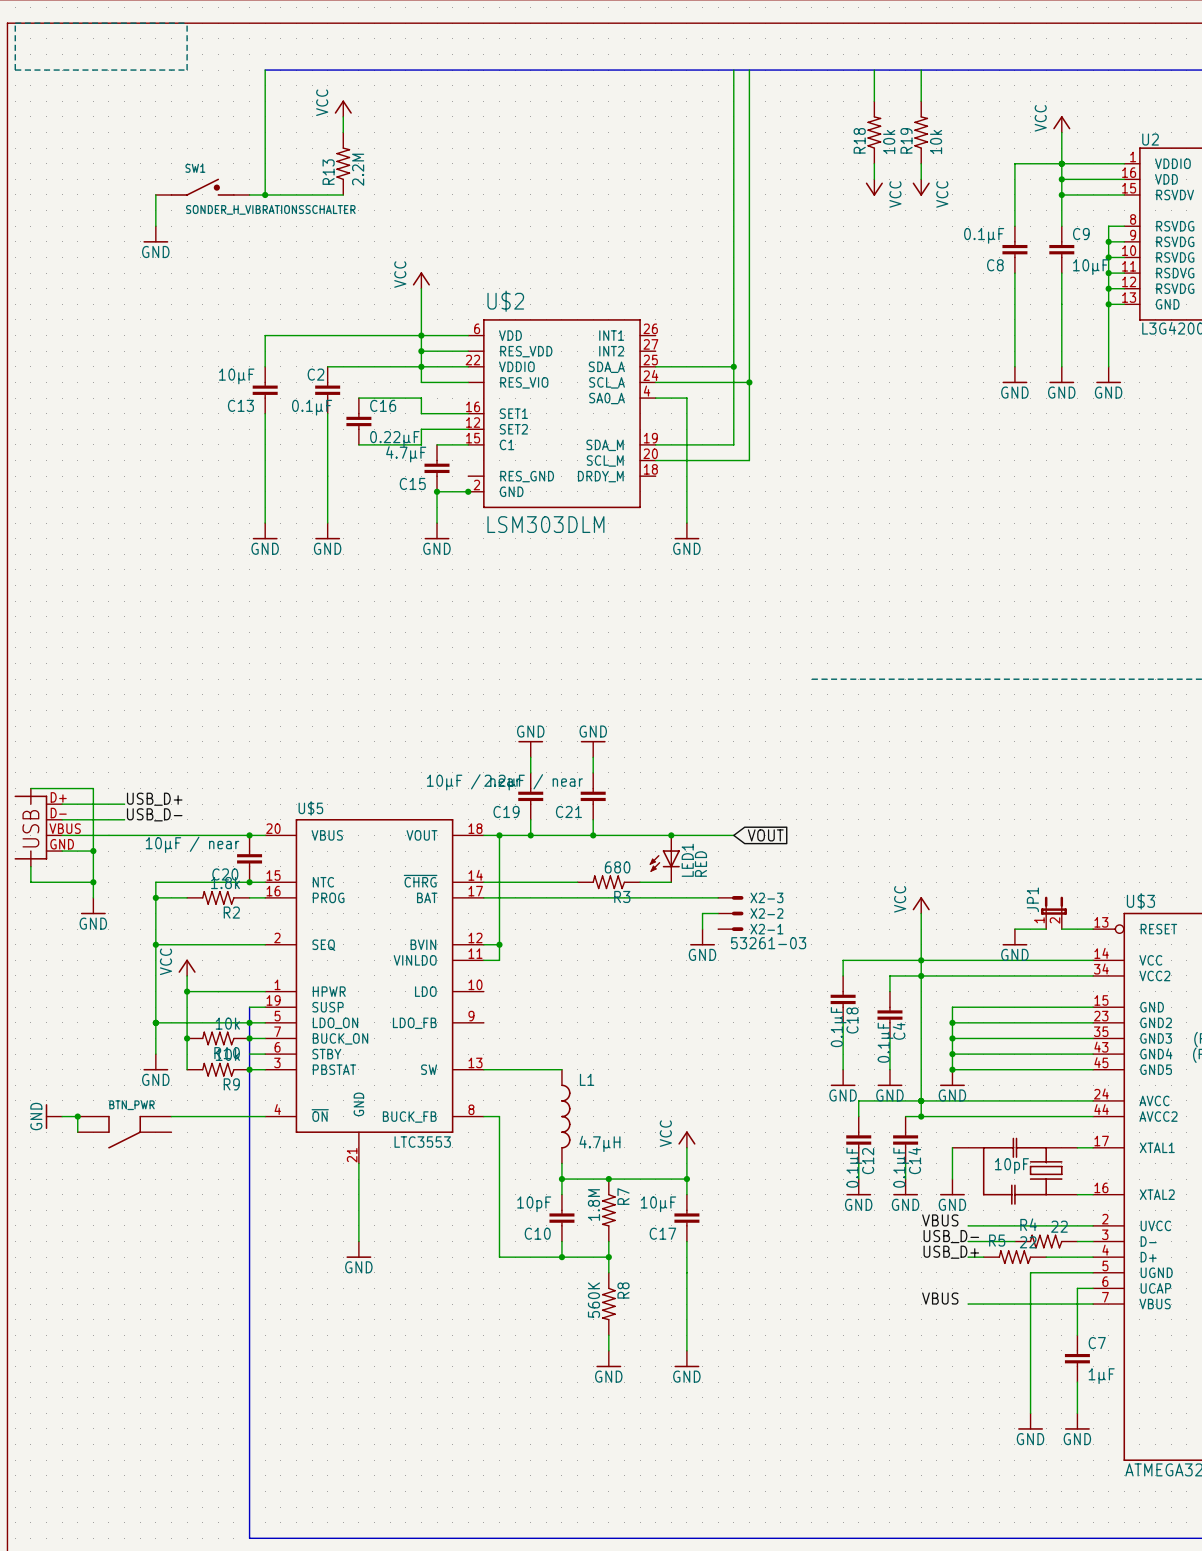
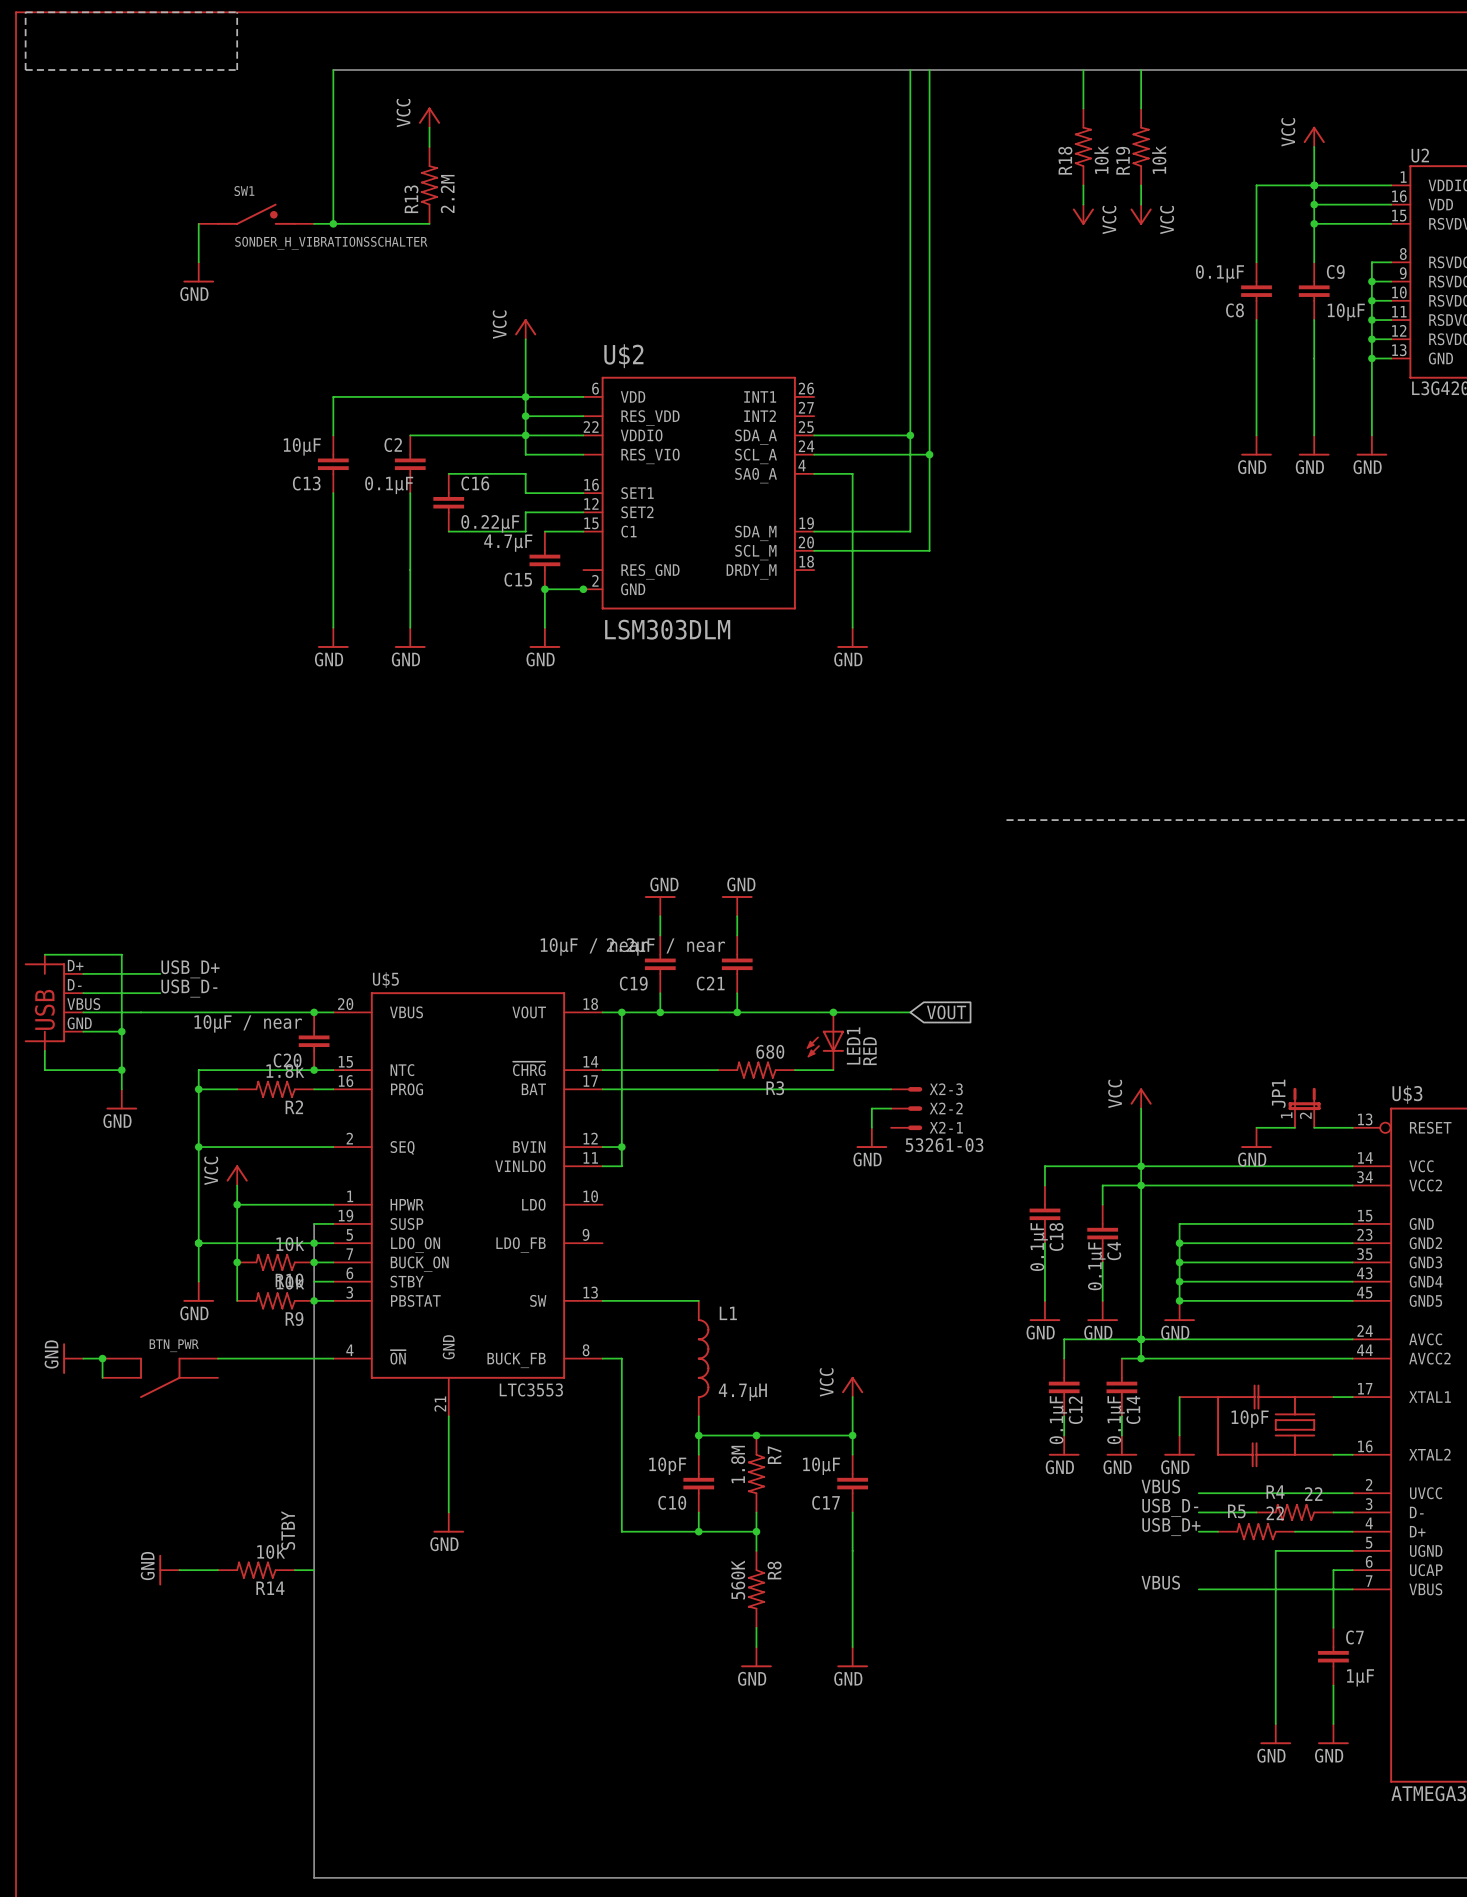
label: none -> STBY (288, 1530)
power symbol: none -> GND (169, 1570)
wire: none -> (179, 1570) (217, 1570)
R14: none -> 10k (256, 1570)
wire: none -> (294, 1570) (314, 1570)

